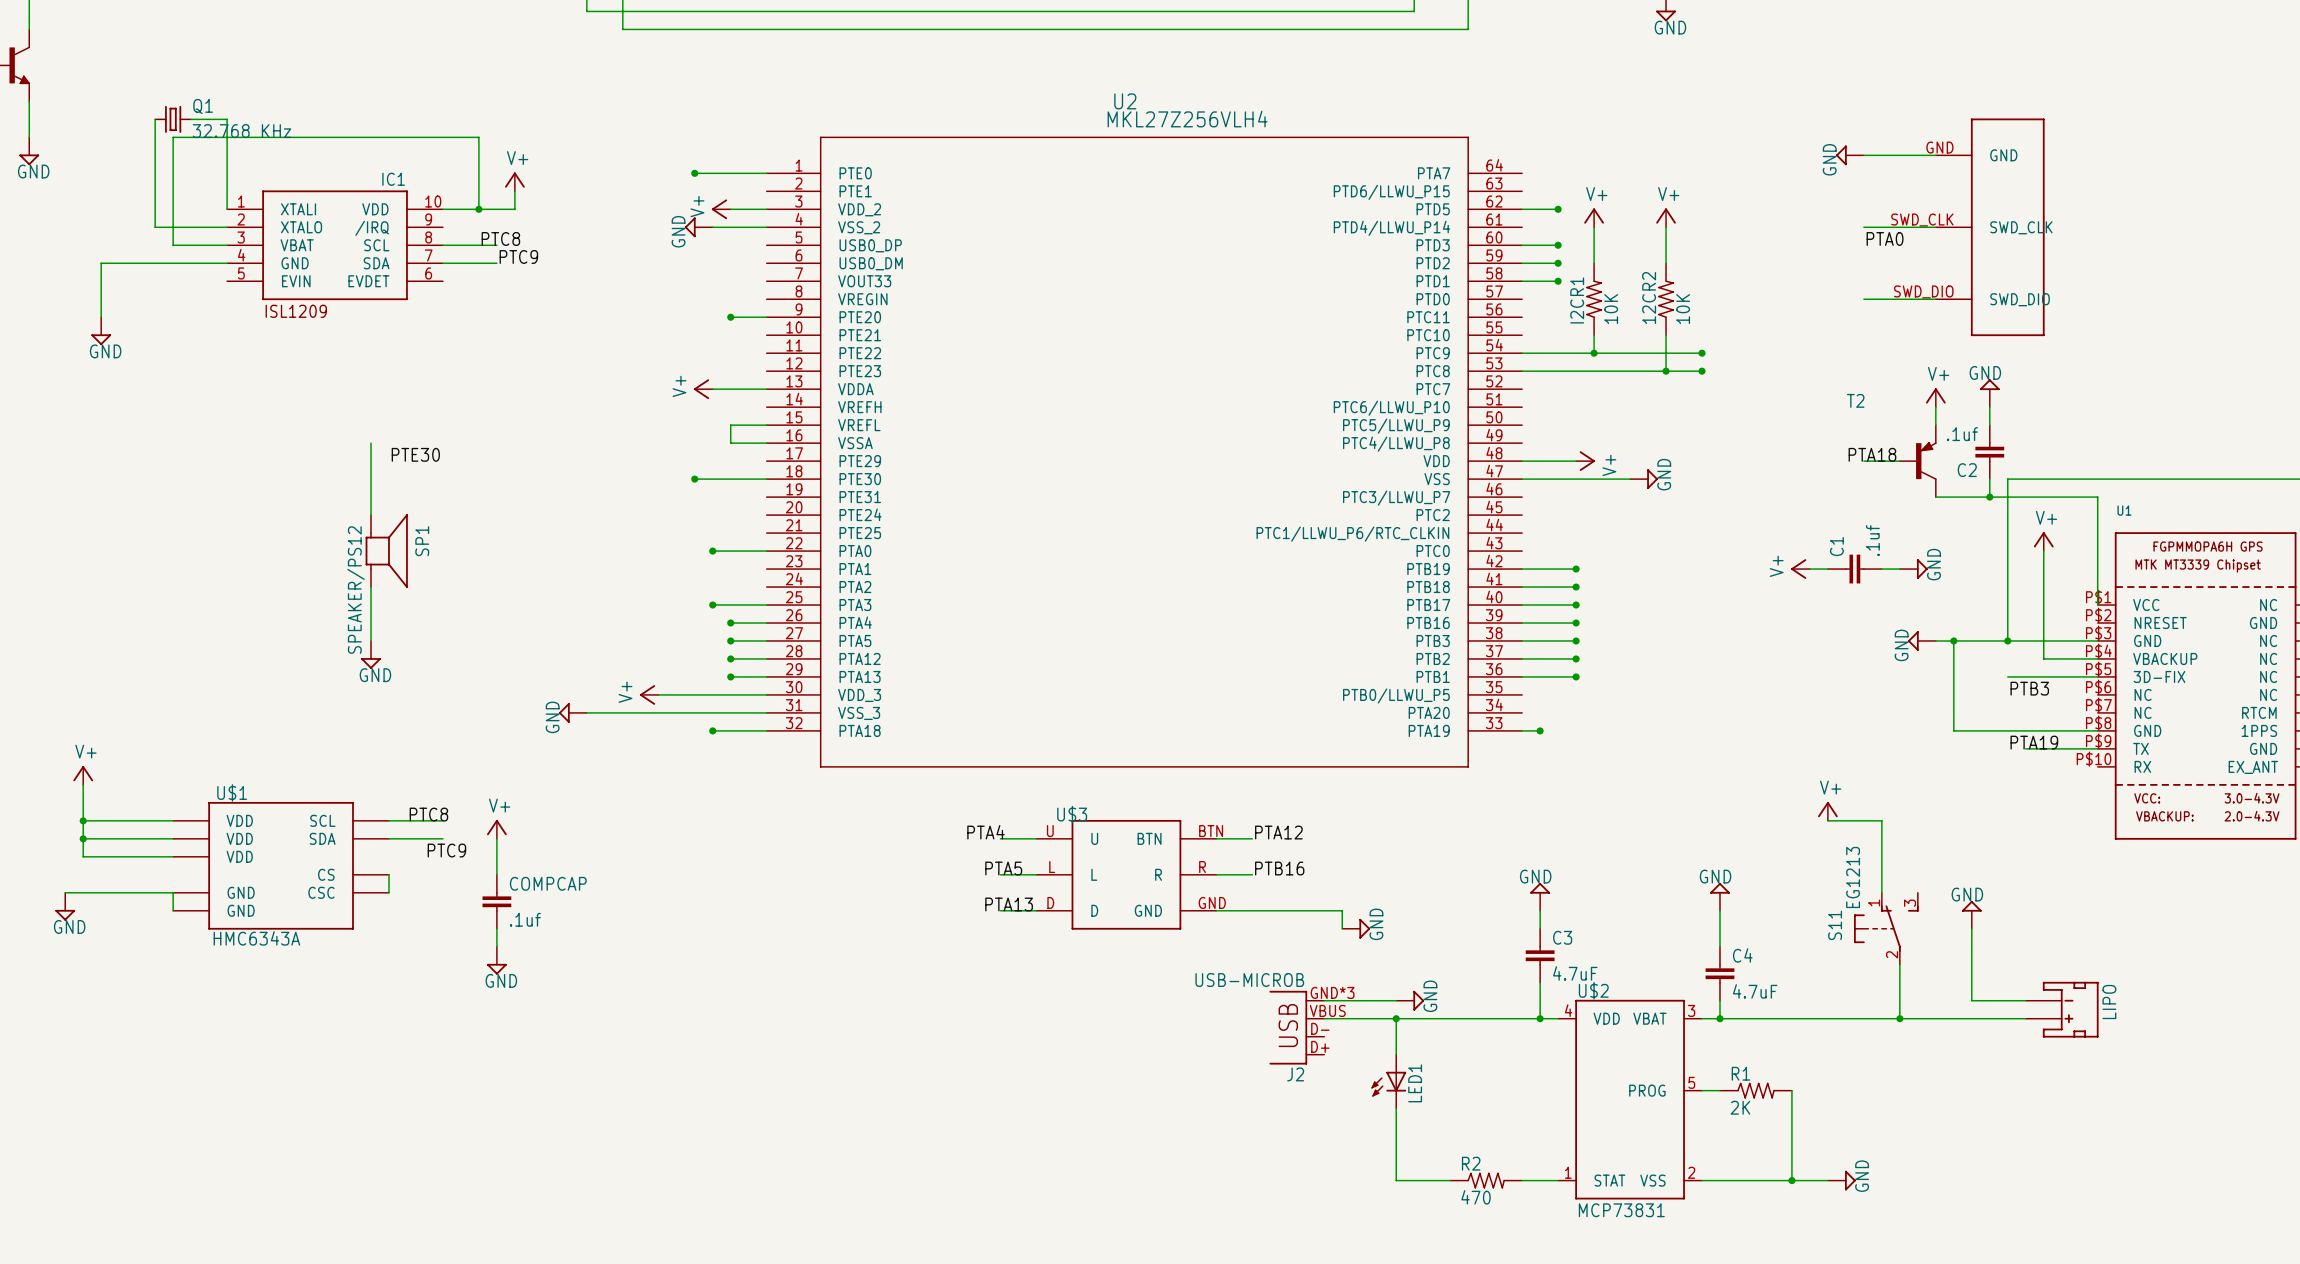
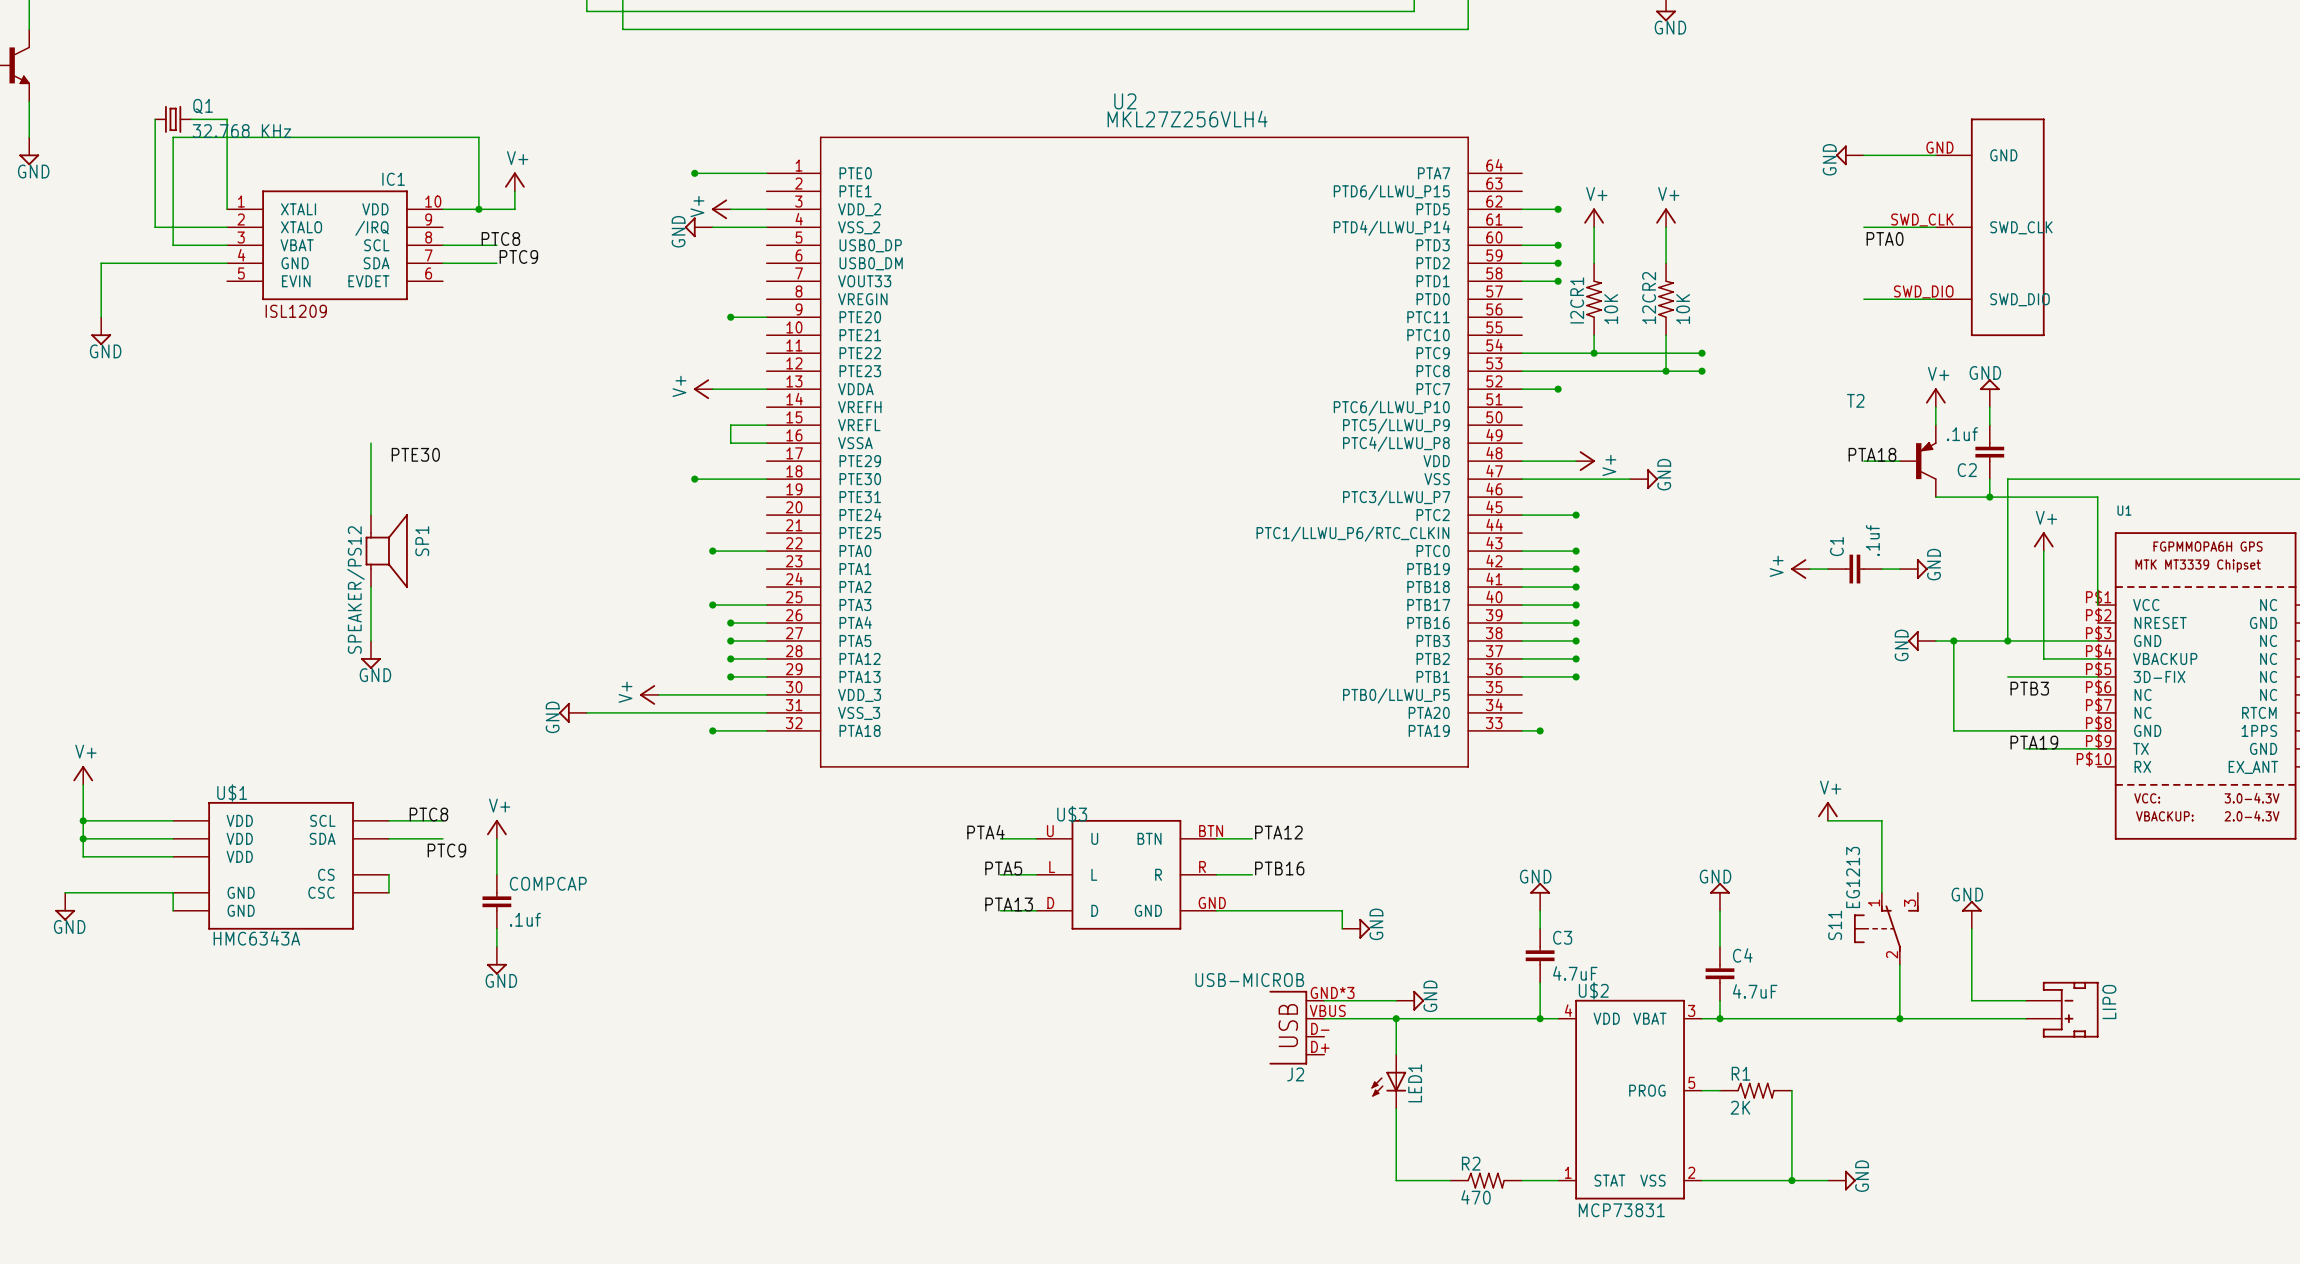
wire: none -> (1522, 389) (1558, 389)
junction: none -> (1558, 389)
wire: none -> (1522, 515) (1576, 515)
junction: none -> (1576, 515)
wire: none -> (1522, 551) (1576, 551)
junction: none -> (1576, 551)

